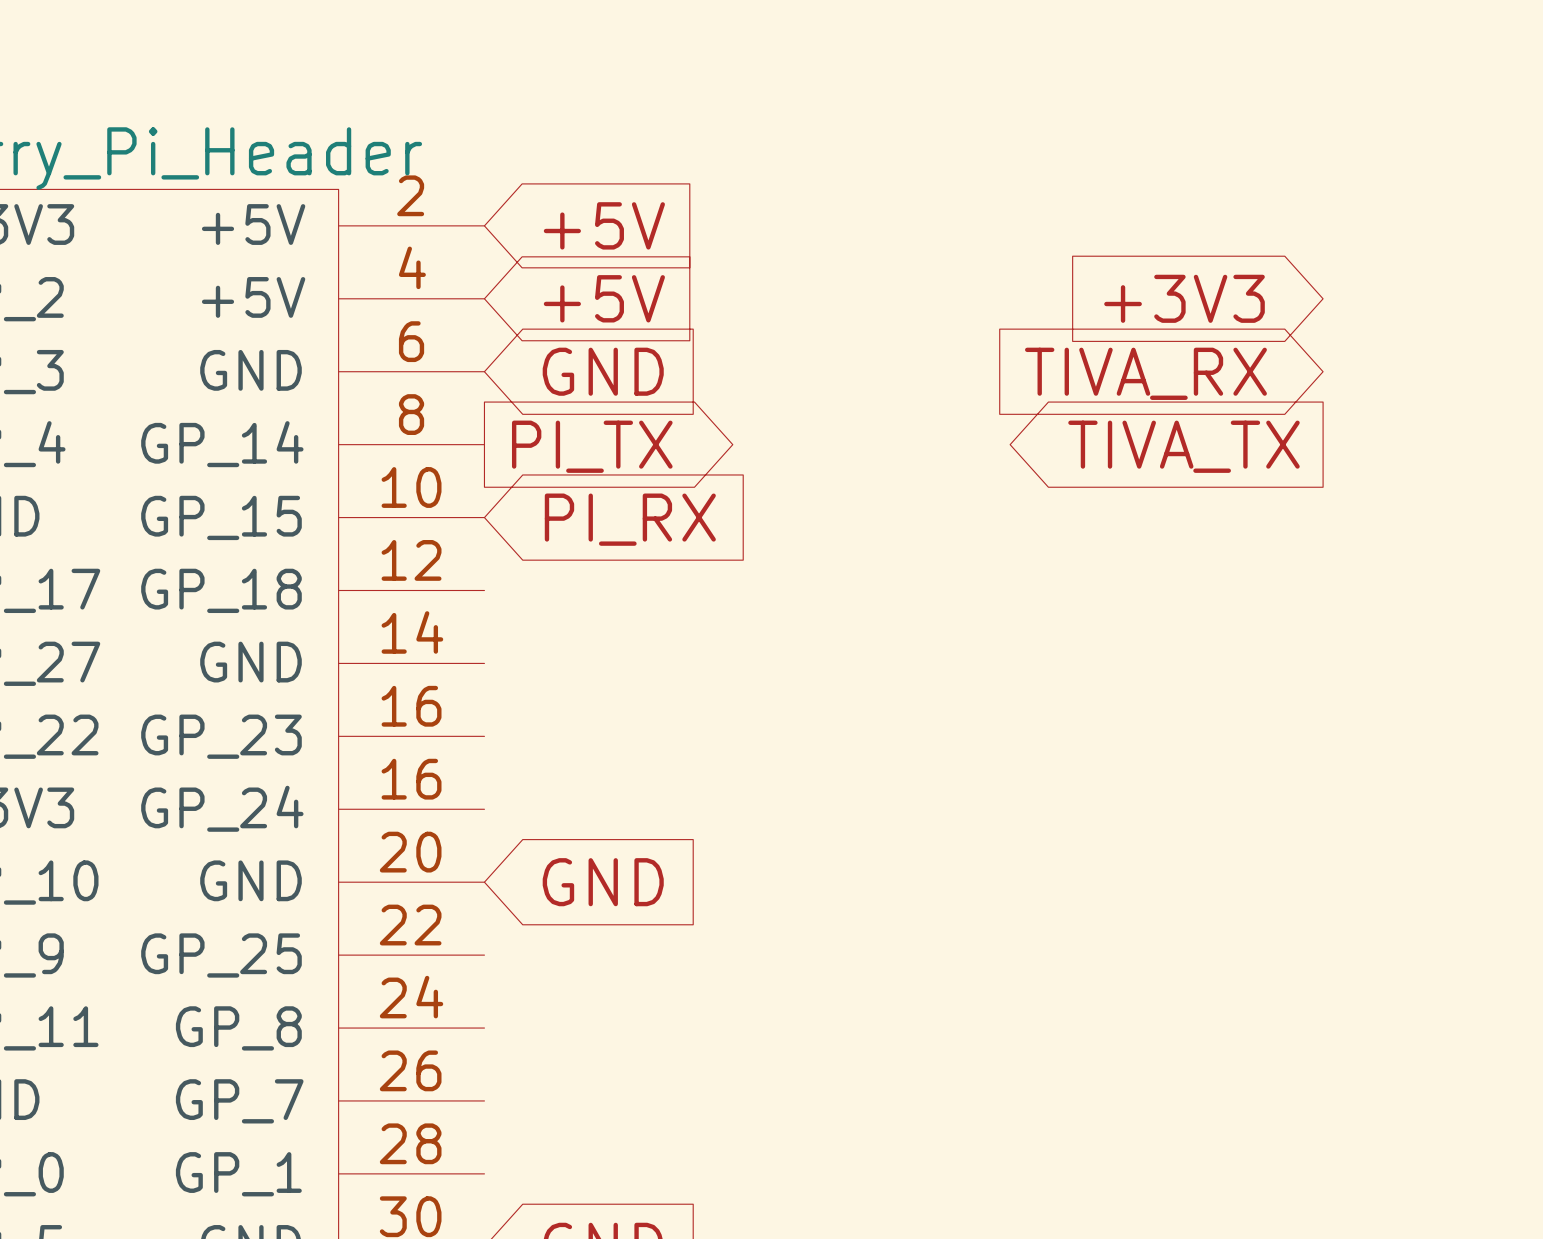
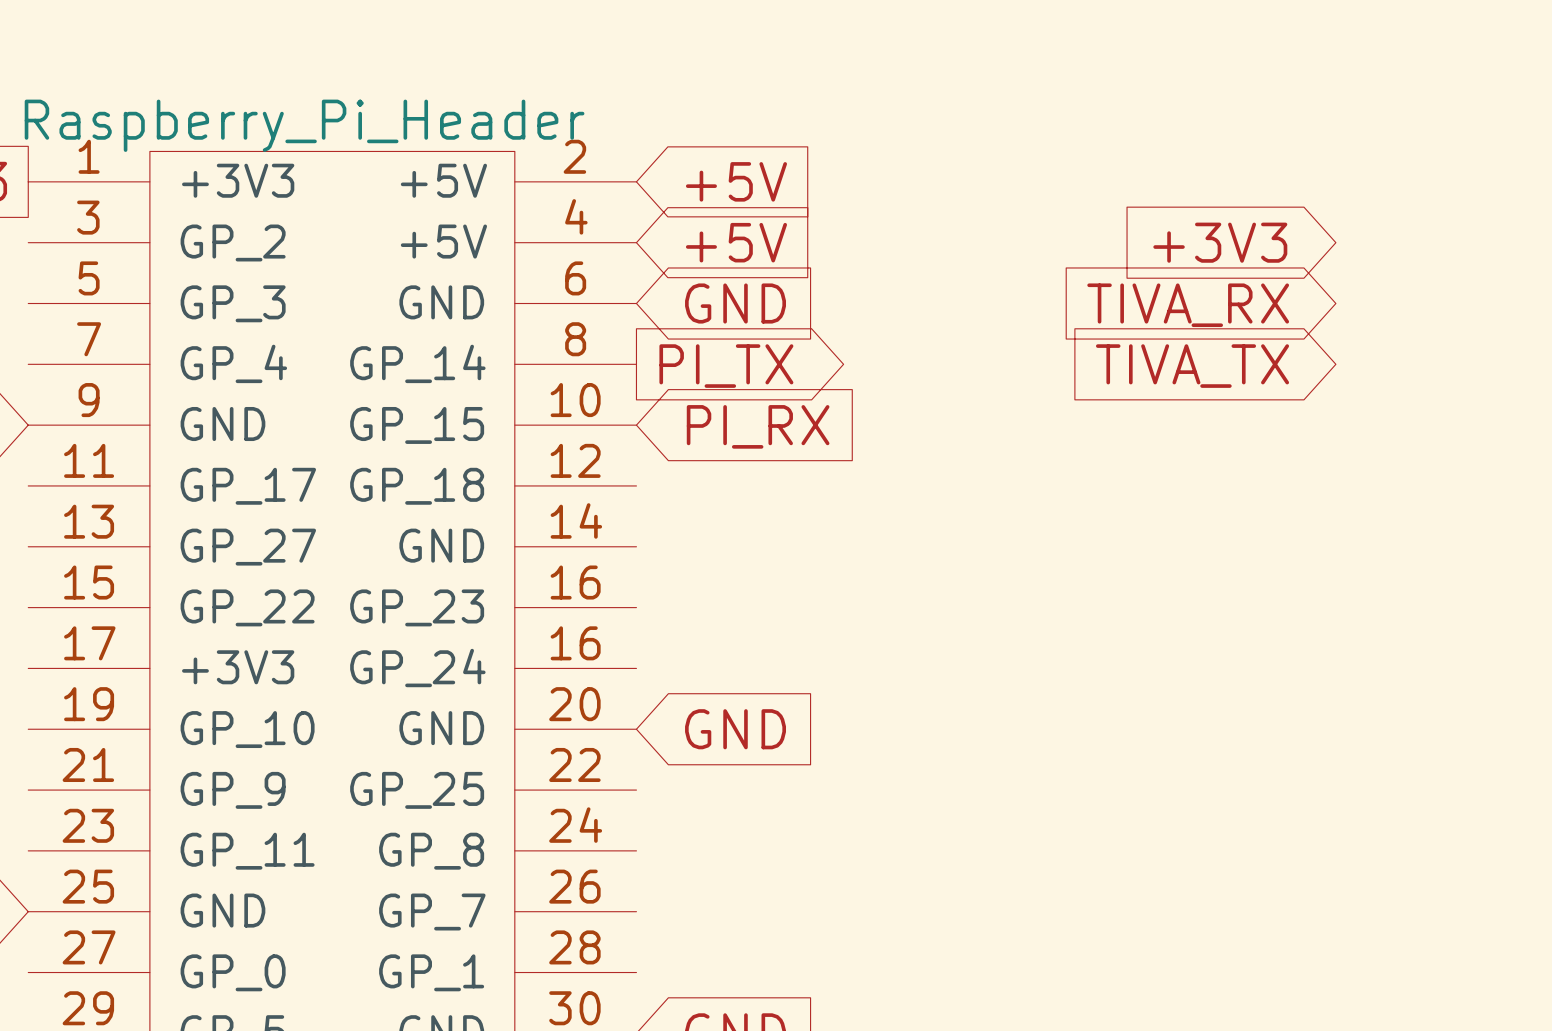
global label shape: output (1183, 446) -> input (1192, 366)

